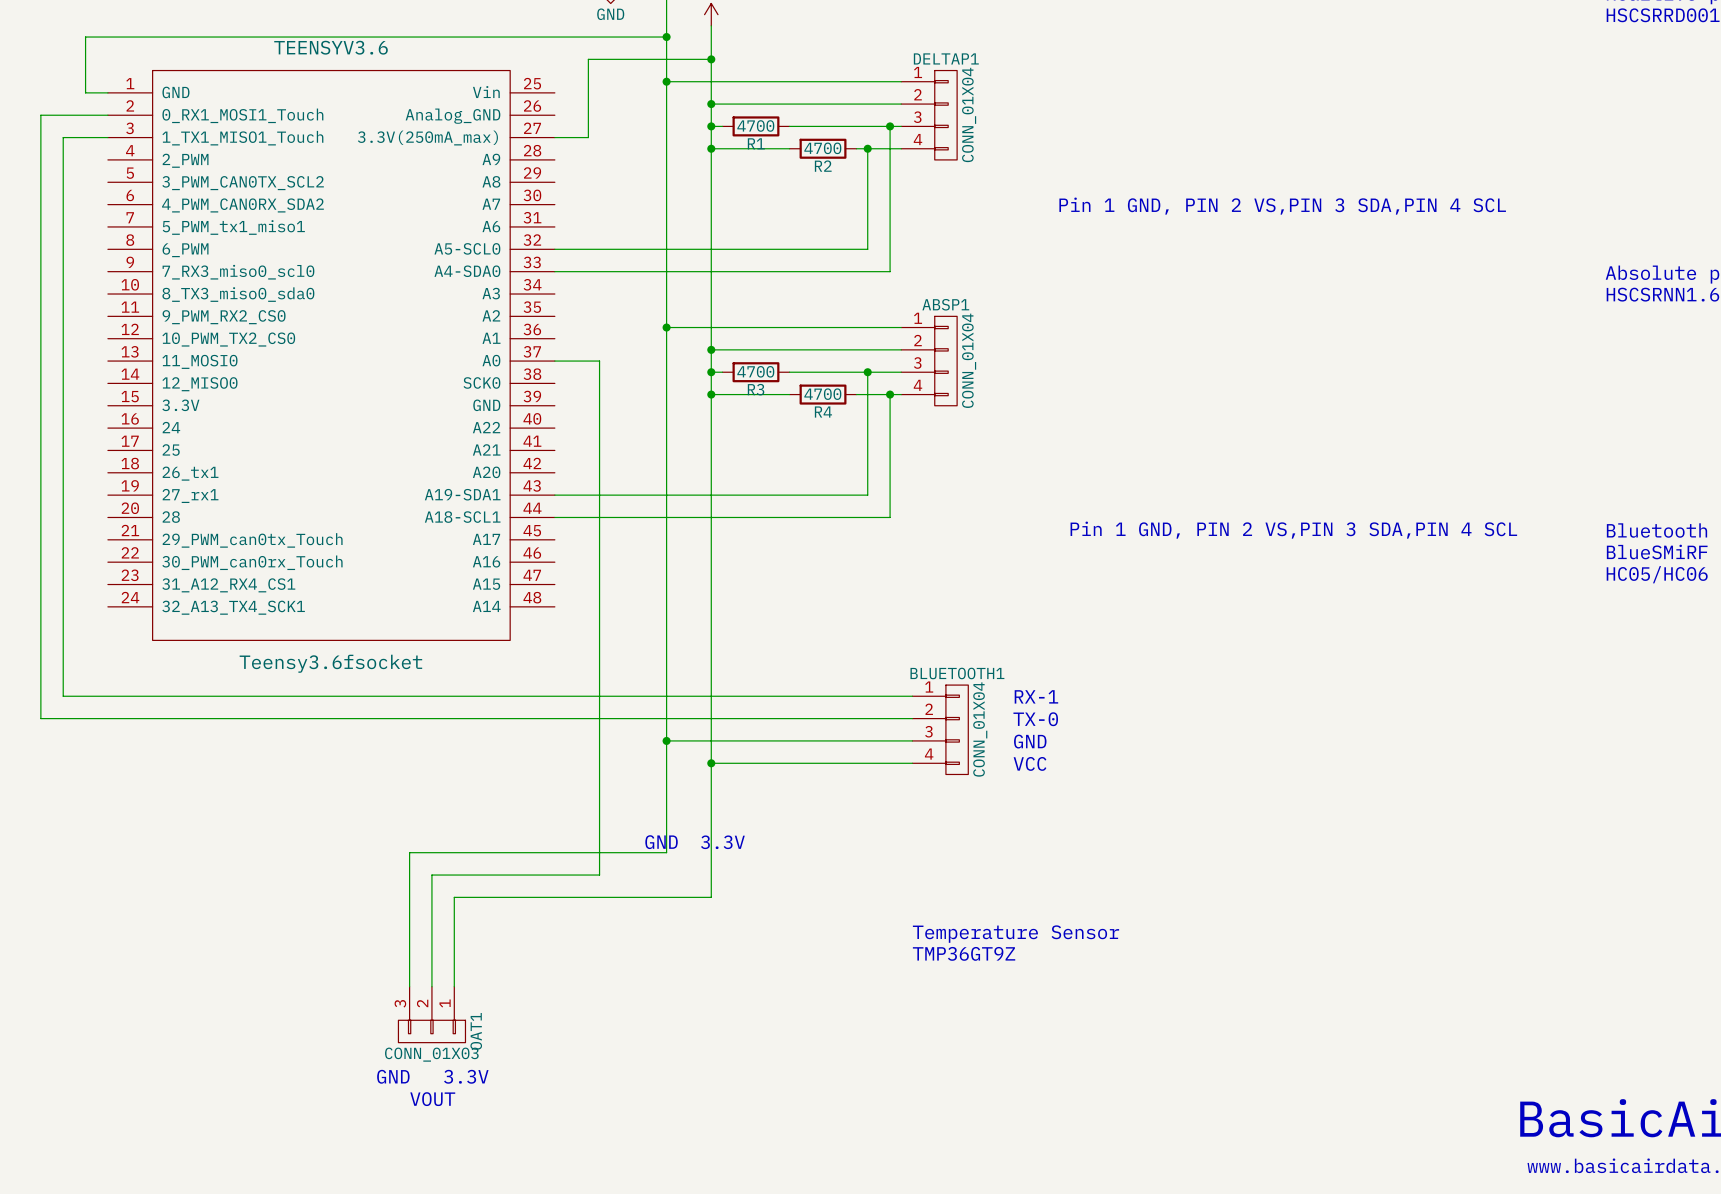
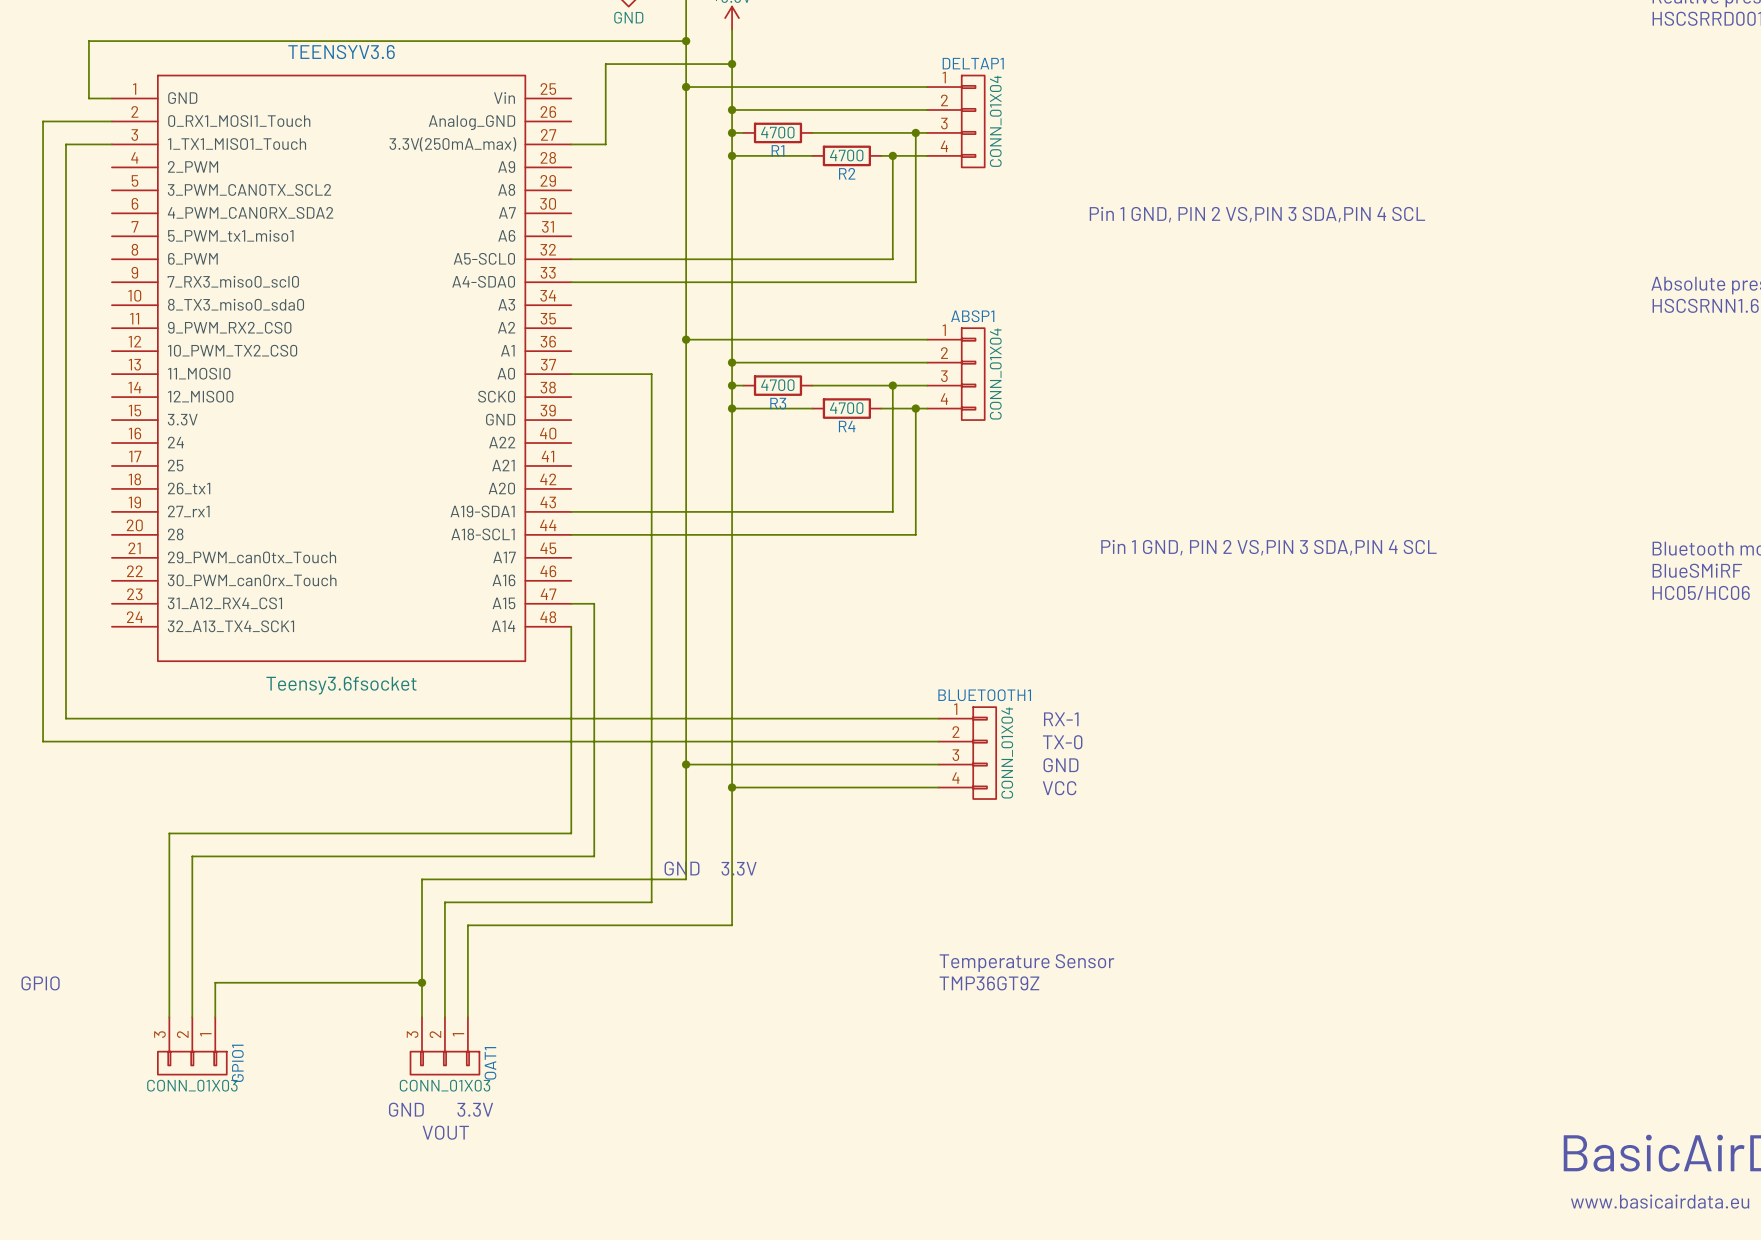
wire: (599, 361) (599, 875) -> (617, 374) (651, 374) (651, 902) (617, 902)
wire: none -> (571, 603) (594, 603) (594, 856) (192, 856) (192, 1017)
wire: none -> (571, 626) (571, 833) (169, 833) (169, 1017)
text: none -> GPIO (40, 983)
wire: none -> (421, 982) (215, 982) (215, 1017)
junction: none -> (421, 982)
GPIO1: none -> CONN_01X03 (192, 1045)

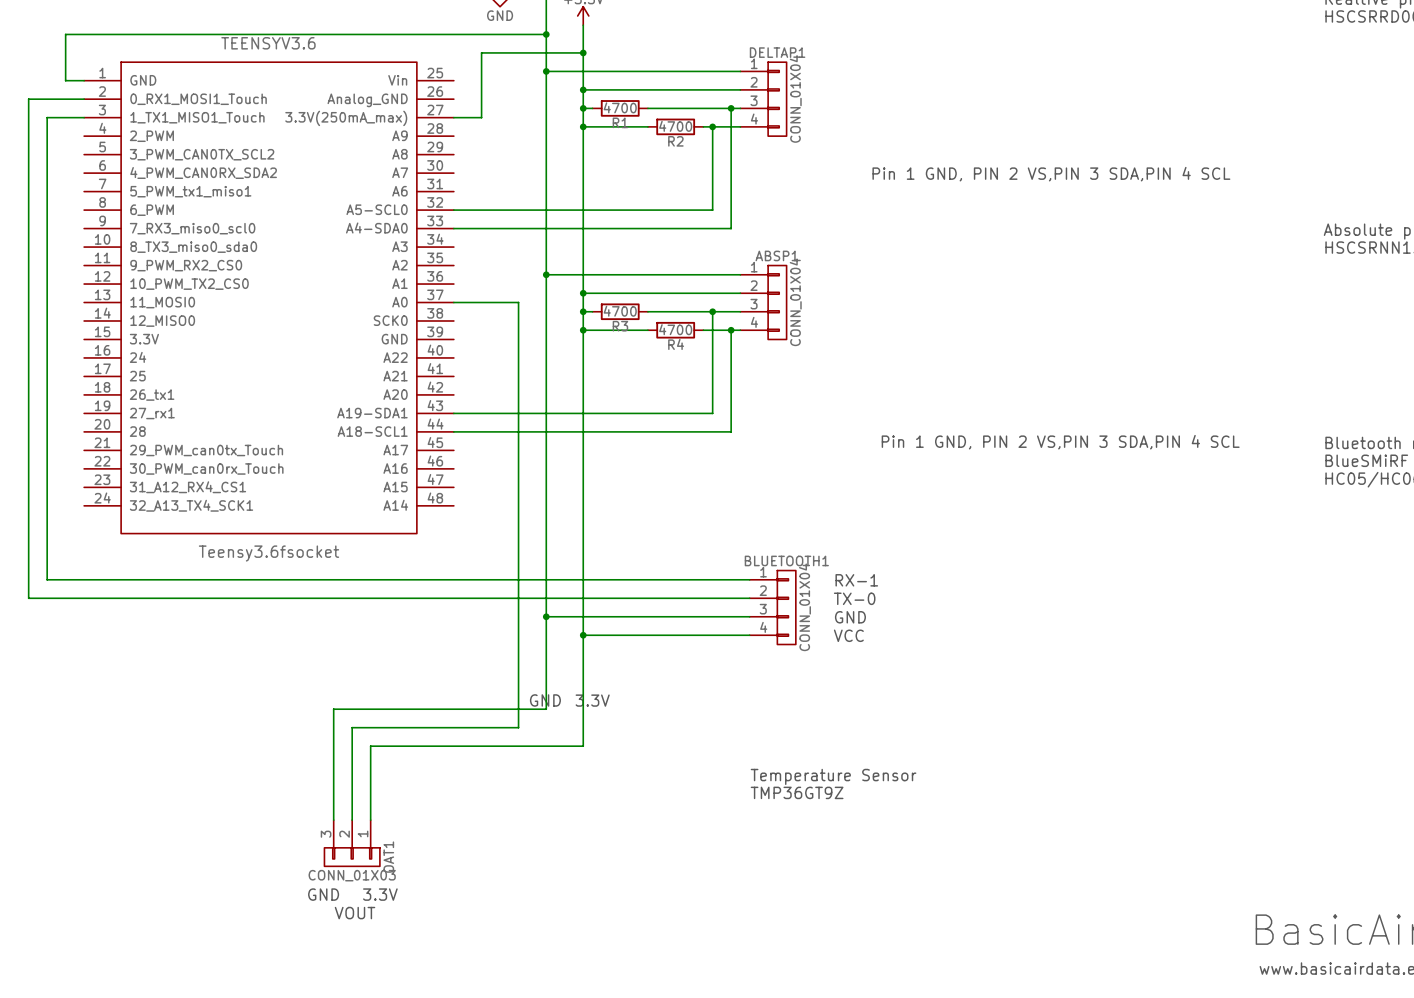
wire: (571, 603) (594, 603) (594, 856) (192, 856) (192, 1017) -> none
wire: (571, 626) (571, 833) (169, 833) (169, 1017) -> none
wire: (421, 982) (215, 982) (215, 1017) -> none
junction: (421, 982) -> none
text: GPIO (40, 983) -> none
GPIO1: CONN_01X03 (192, 1045) -> none

